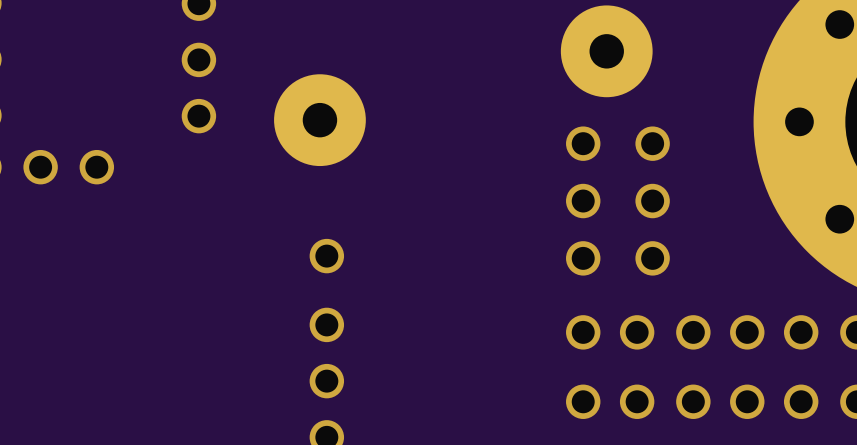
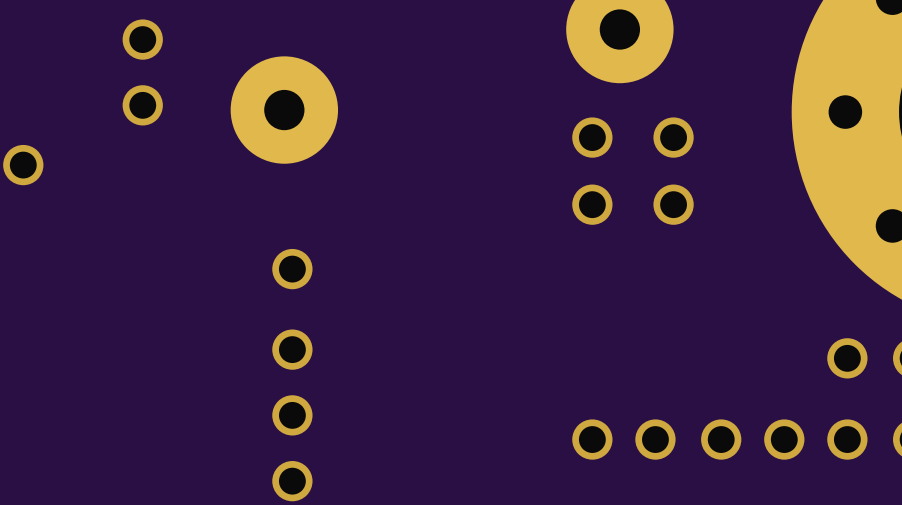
via: (583, 258) -> none
via: (652, 258) -> none
via: (583, 332) -> none
via: (637, 332) -> none
via: (693, 332) -> none
via: (747, 332) -> none

